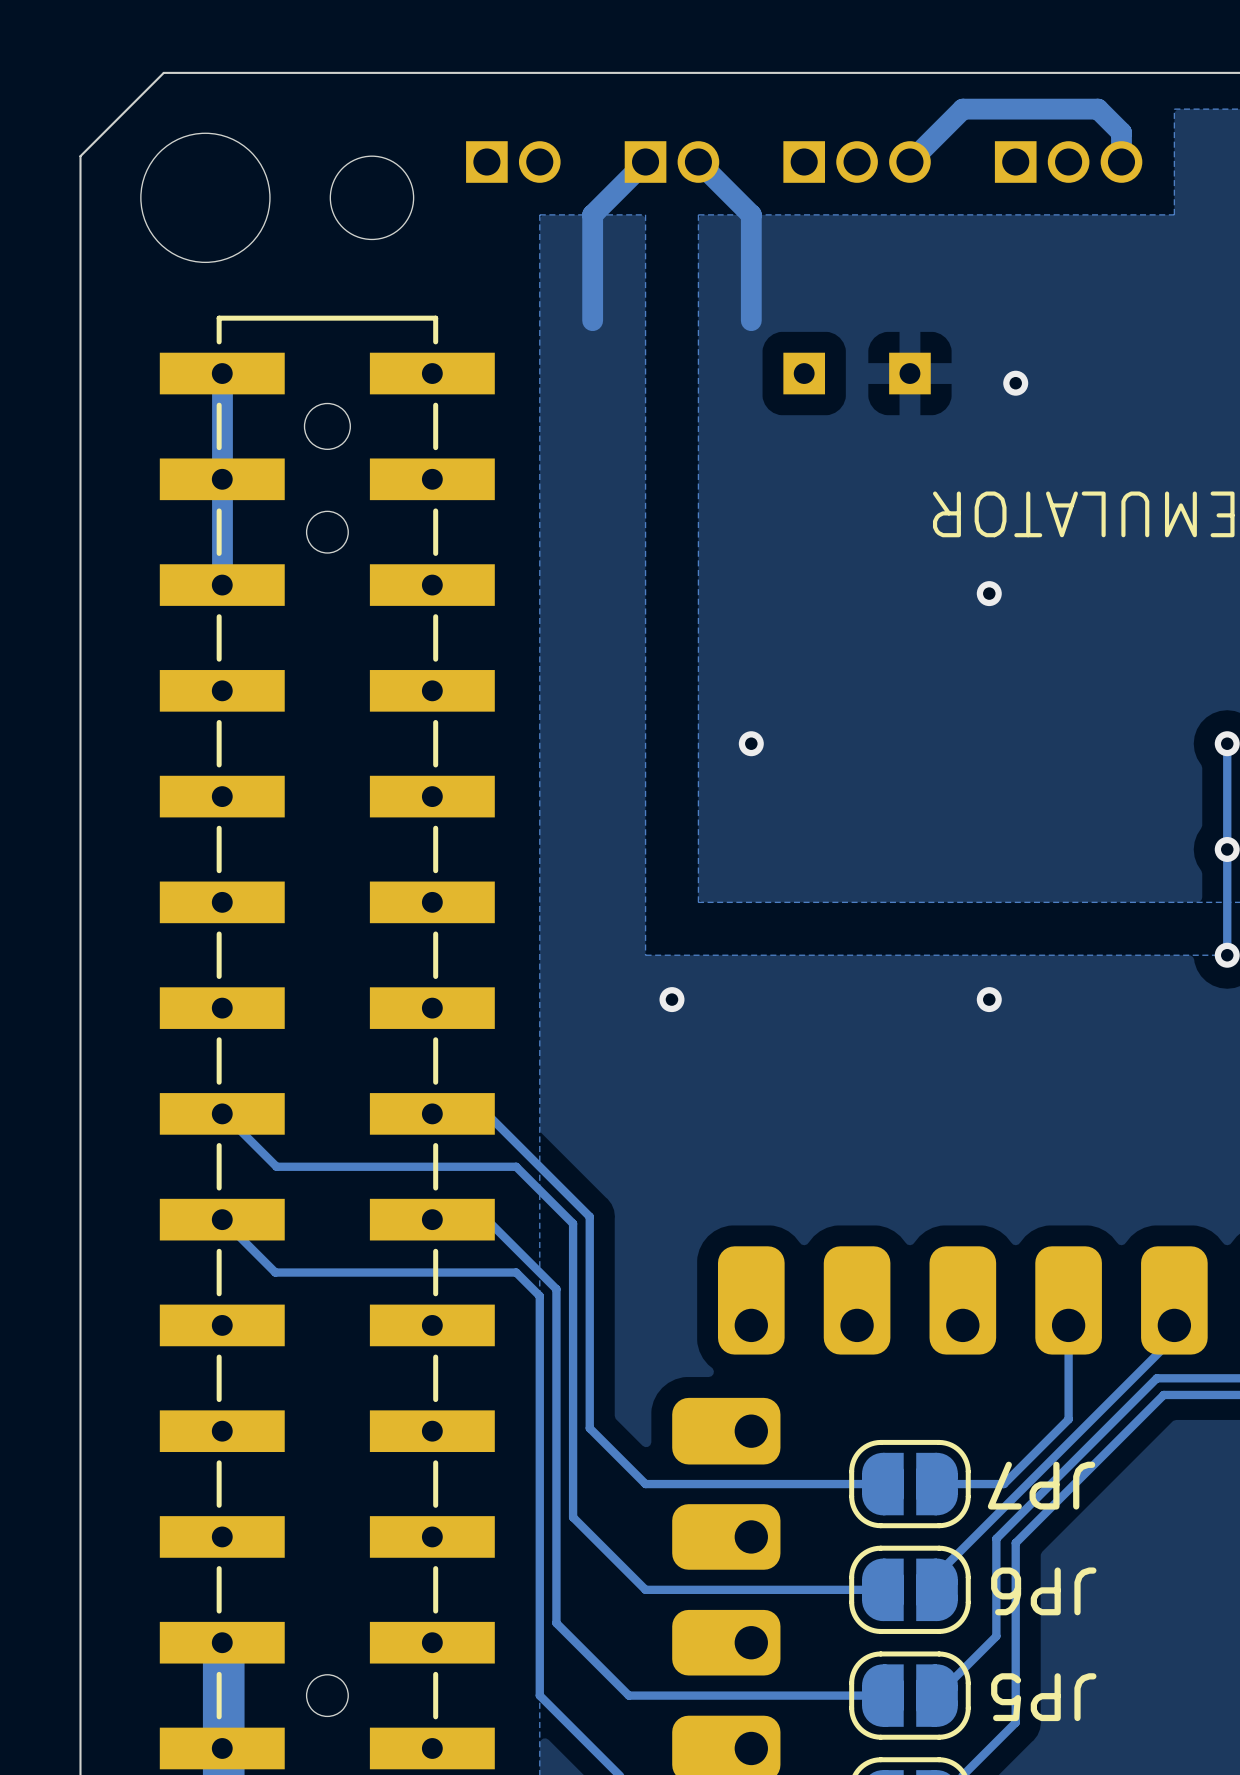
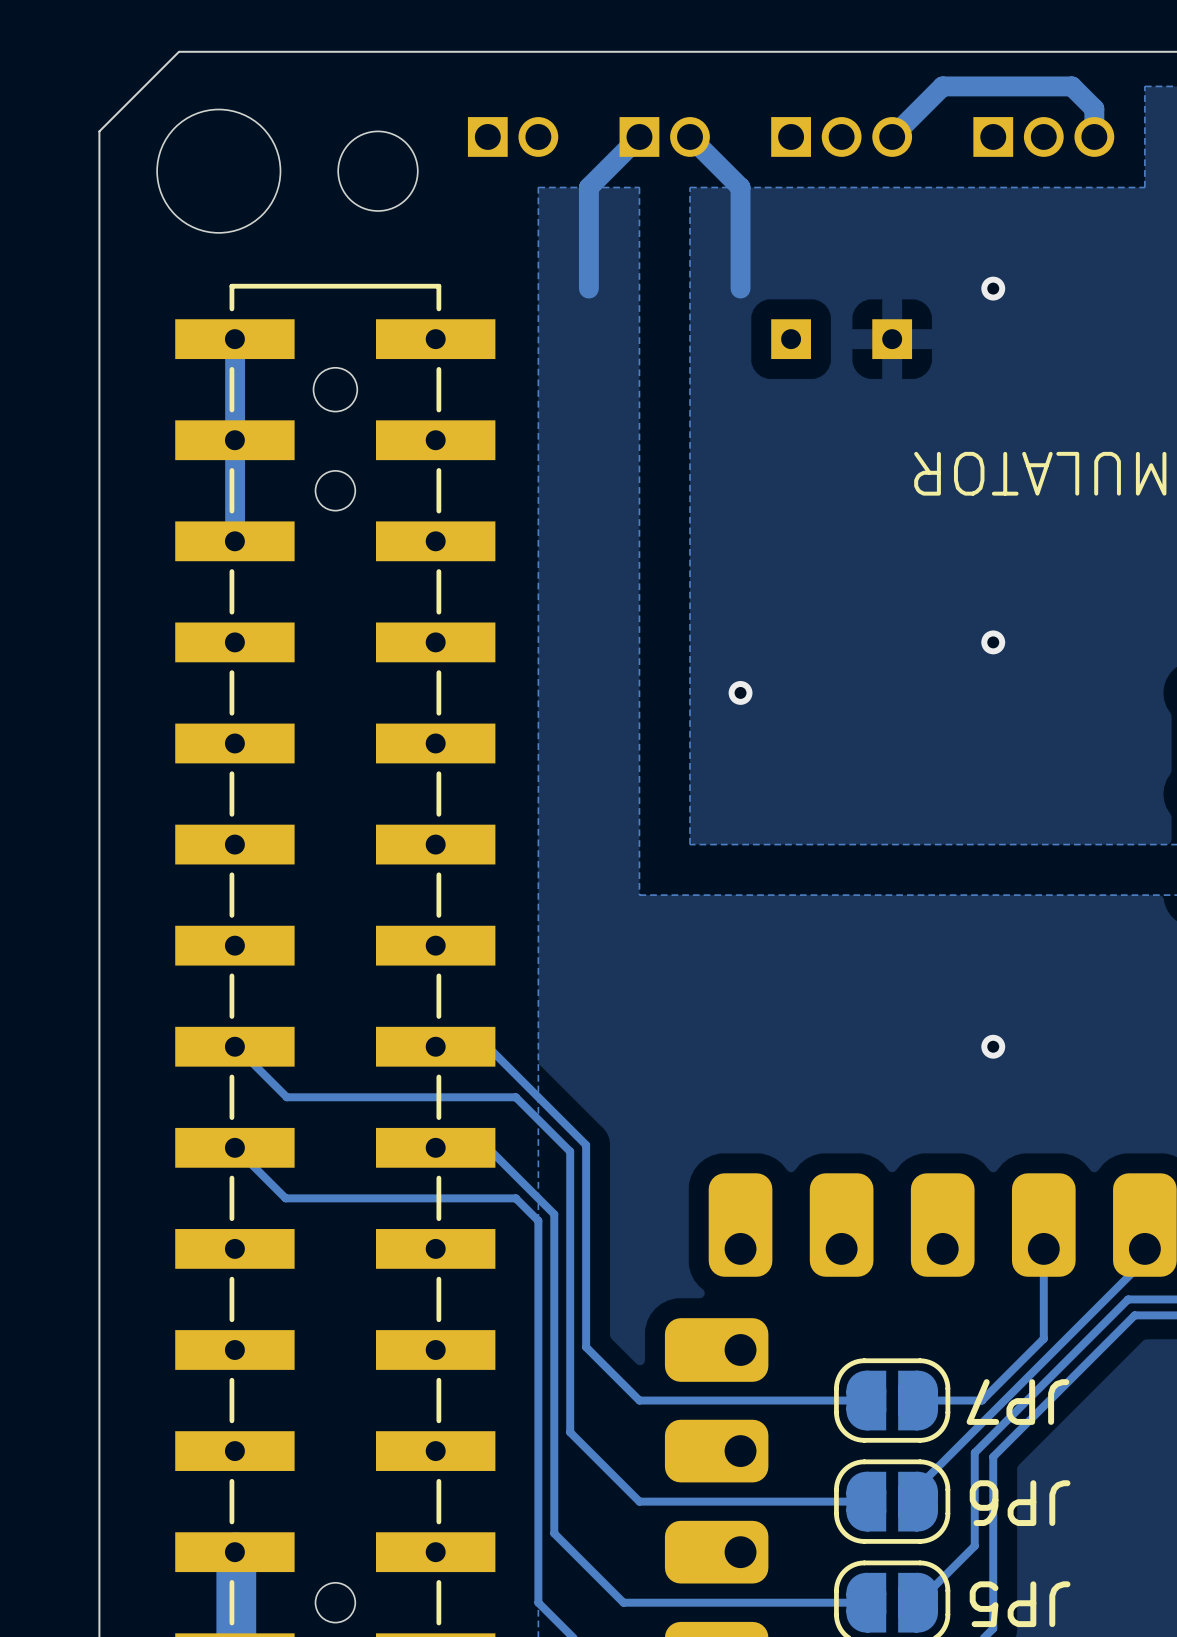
via position: (1015, 383) -> (993, 288)
via position: (989, 593) -> (993, 642)
via: (671, 999) -> none
via position: (989, 999) -> (993, 1046)

